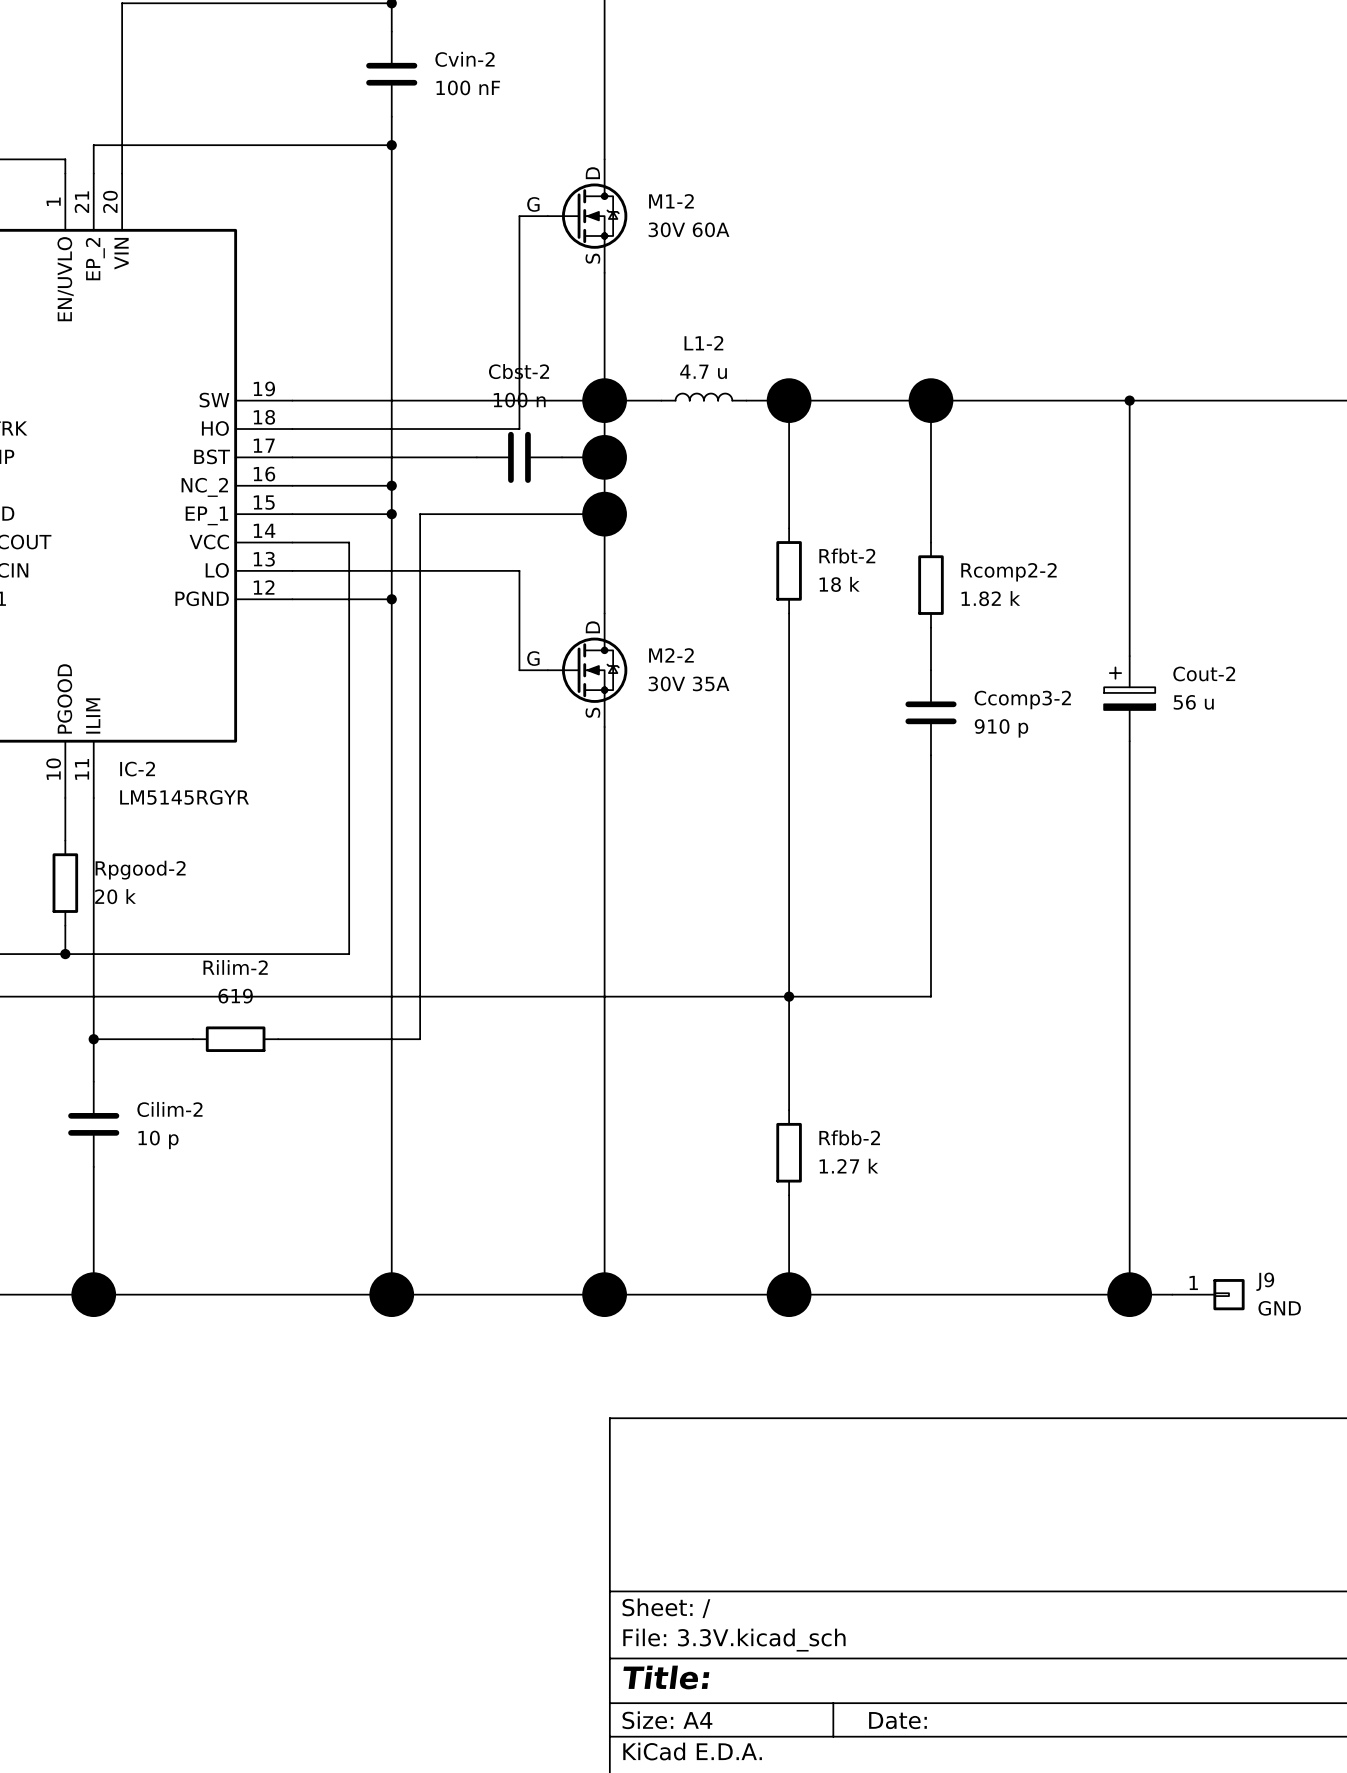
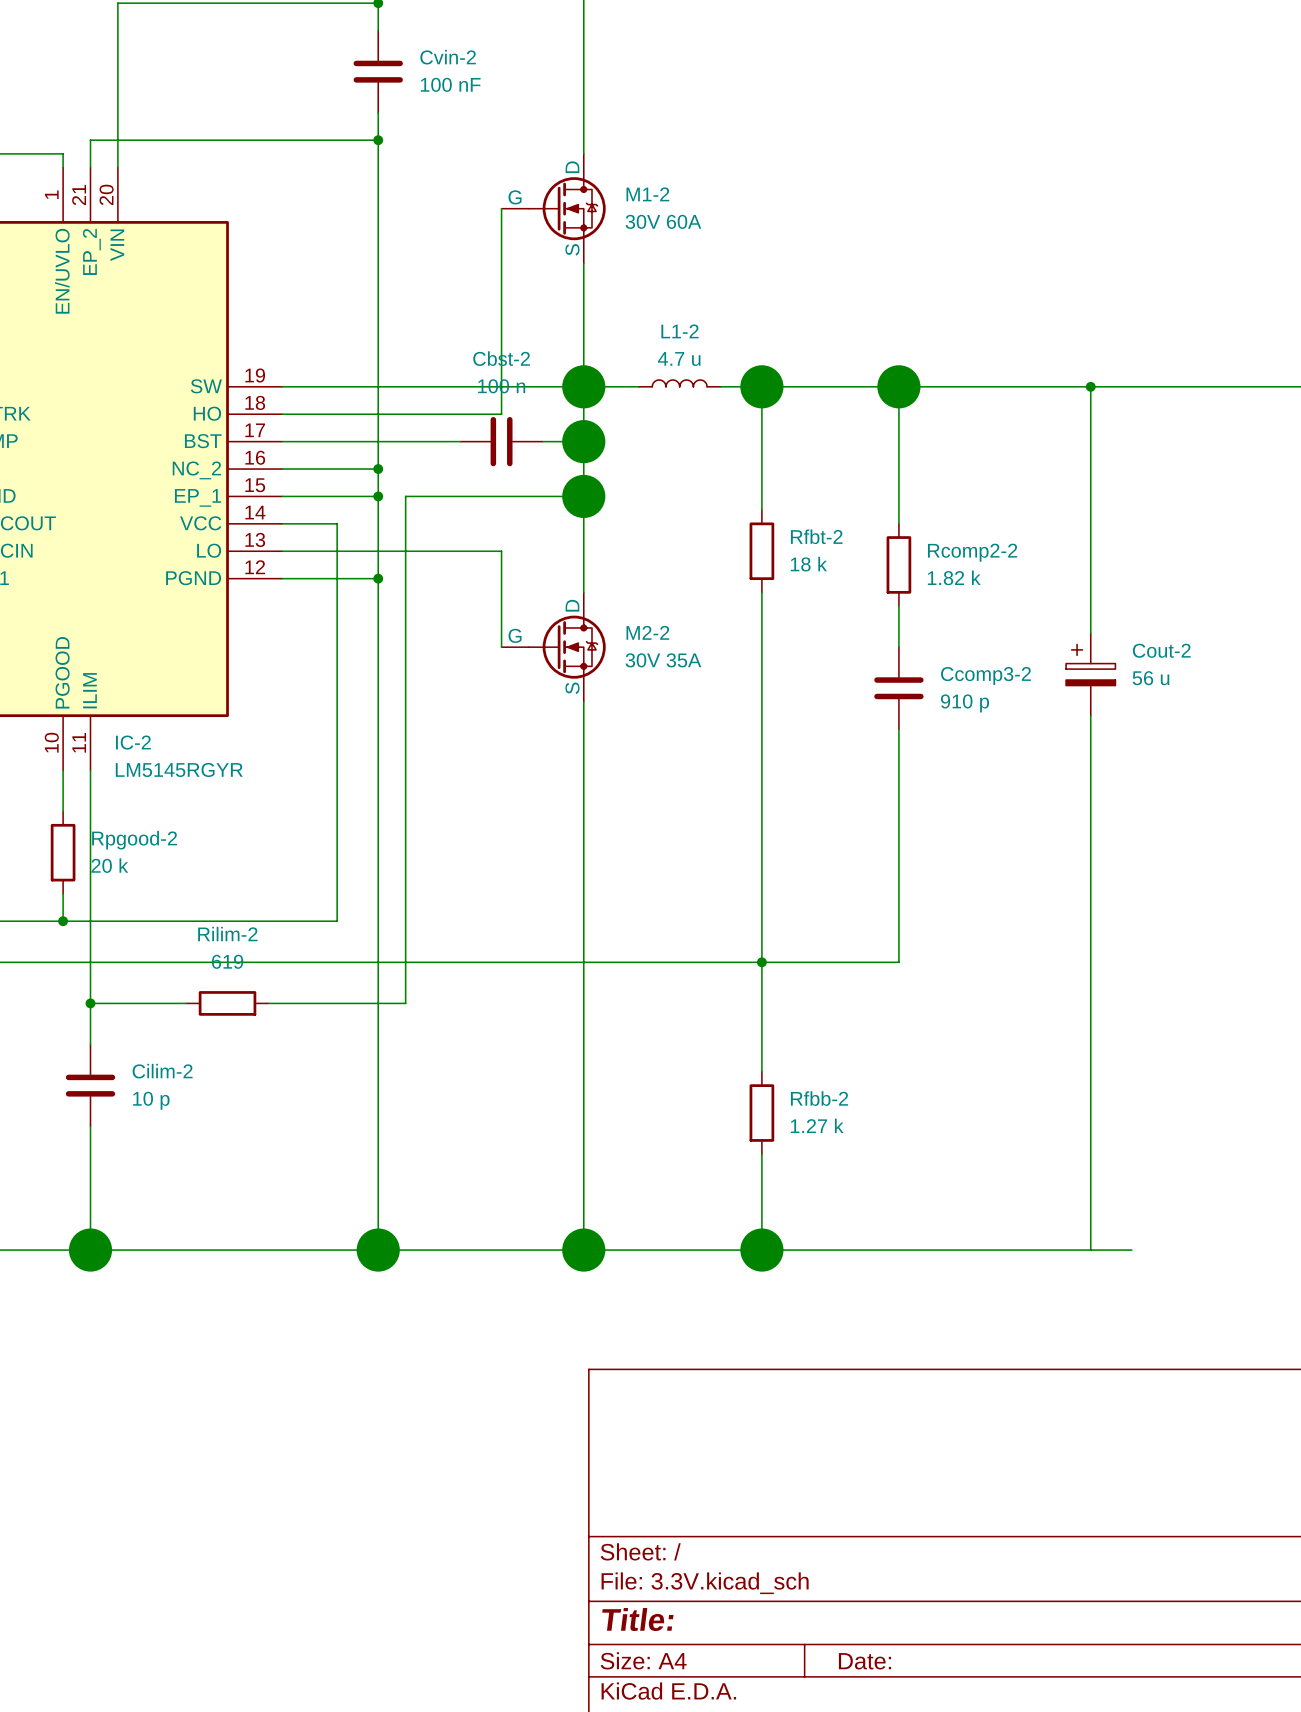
junction: (1129, 1294) -> none
J9: GND (1208, 1294) -> none

